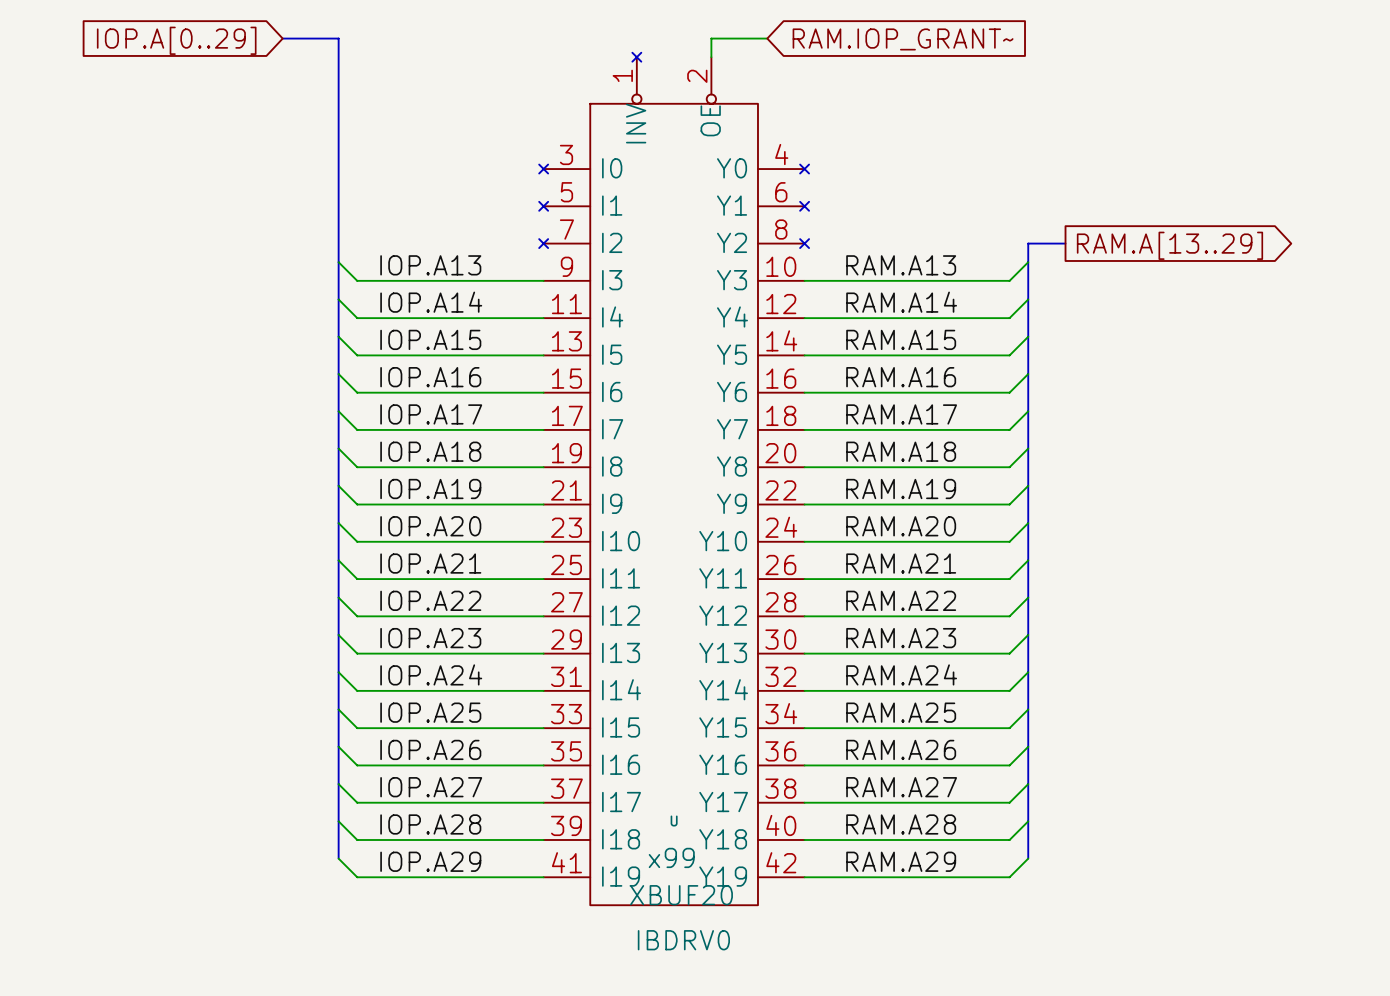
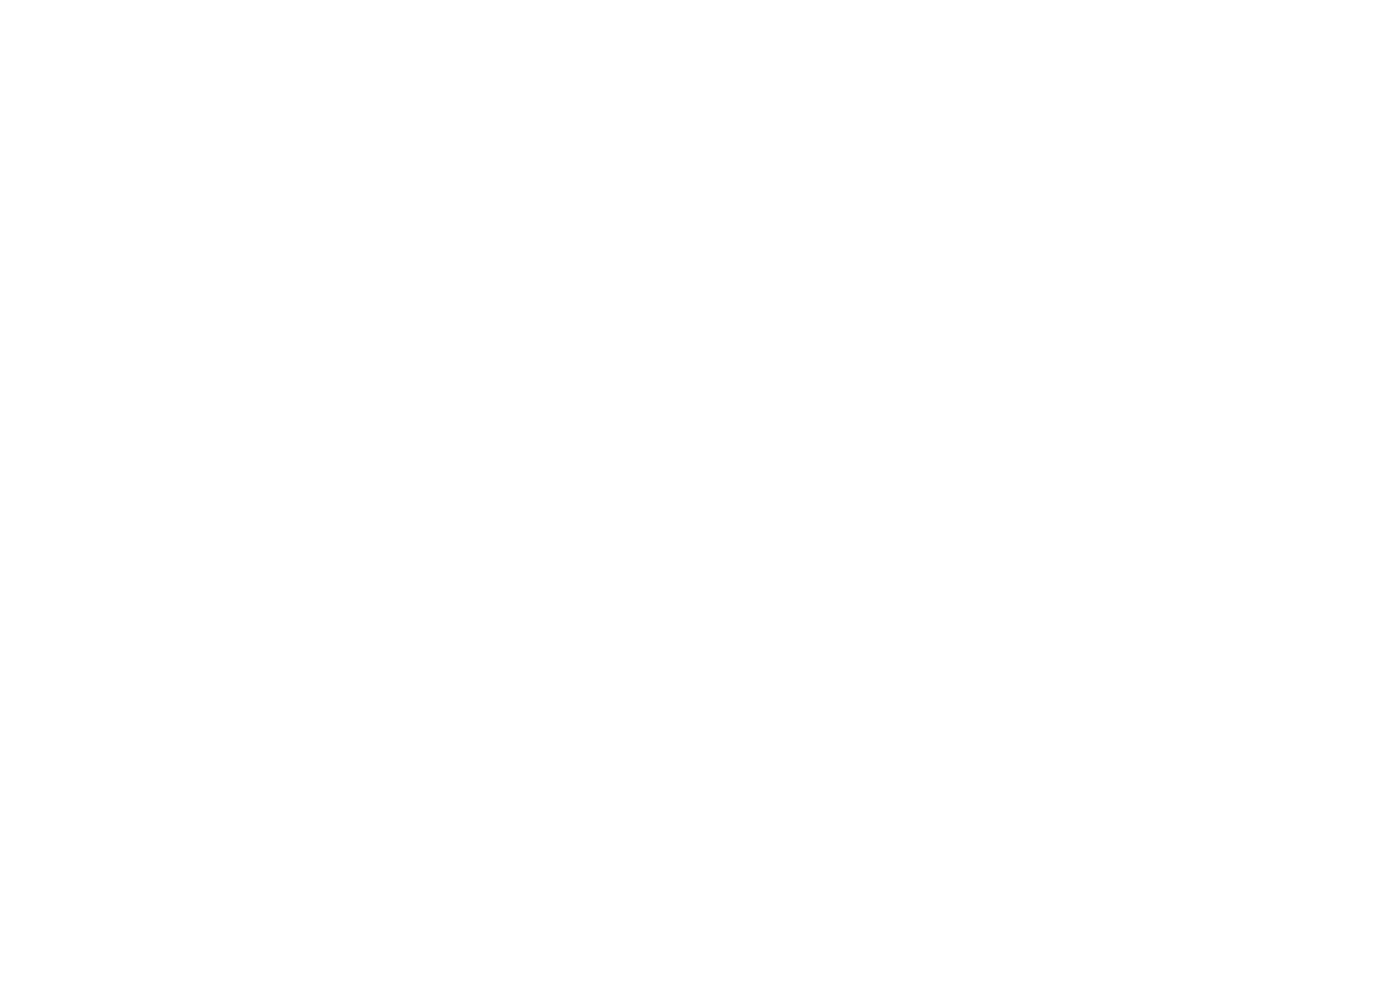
bus: (282, 38) (338, 38) (338, 858) -> none
wire: (767, 38) (711, 38) (711, 57) -> none
global label: RAM.IOP_GRANT~ (903, 39) -> none
global label: IOP.A[0..29] (176, 40) -> none
no-connect mark: (636, 57) -> none
no-connect mark: (543, 169) -> none
no-connect mark: (804, 169) -> none
no-connect mark: (543, 206) -> none
no-connect mark: (804, 206) -> none
no-connect mark: (543, 243) -> none
no-connect mark: (804, 243) -> none
bus: (1065, 243) (1028, 243) (1028, 858) -> none
global label: RAM.A[13..29] (1169, 245) -> none
wire: (338, 262) (357, 280) (543, 280) -> none
wire: (1028, 262) (1009, 280) (804, 280) -> none
label: IOP.A13 (430, 265) -> none
label: RAM.A13 (901, 265) -> none
wire: (338, 299) (357, 318) (543, 318) -> none
wire: (1028, 299) (1009, 318) (804, 318) -> none
label: IOP.A14 (431, 302) -> none
label: RAM.A14 (901, 302) -> none
wire: (338, 336) (357, 355) (543, 355) -> none
wire: (1028, 336) (1009, 355) (804, 355) -> none
label: IOP.A15 (430, 339) -> none
label: RAM.A15 (901, 339) -> none
wire: (338, 374) (357, 392) (543, 392) -> none
wire: (1028, 374) (1009, 392) (804, 392) -> none
label: IOP.A16 (430, 377) -> none
label: RAM.A16 (901, 377) -> none
wire: (338, 411) (357, 429) (543, 429) -> none
wire: (1028, 411) (1009, 429) (804, 429) -> none
label: IOP.A17 (431, 414) -> none
label: RAM.A17 (901, 414) -> none
wire: (338, 448) (357, 467) (543, 467) -> none
wire: (1028, 448) (1009, 467) (804, 467) -> none
label: IOP.A18 (430, 451) -> none
label: RAM.A18 (901, 451) -> none
U: XBUF20 (674, 481) -> none
wire: (338, 485) (357, 504) (543, 504) -> none
wire: (1028, 485) (1009, 504) (804, 504) -> none
label: IOP.A19 (430, 489) -> none
label: RAM.A19 (901, 489) -> none
wire: (338, 523) (357, 541) (543, 541) -> none
wire: (1028, 523) (1009, 541) (804, 541) -> none
label: IOP.A20 (430, 526) -> none
label: RAM.A20 (901, 526) -> none
wire: (338, 560) (357, 579) (543, 579) -> none
wire: (1028, 560) (1009, 579) (804, 579) -> none
label: IOP.A21 (430, 563) -> none
label: RAM.A21 (901, 563) -> none
wire: (338, 597) (357, 616) (543, 616) -> none
wire: (1028, 597) (1009, 616) (804, 616) -> none
label: IOP.A22 (430, 600) -> none
label: RAM.A22 (901, 600) -> none
wire: (338, 634) (357, 653) (543, 653) -> none
wire: (1028, 634) (1009, 653) (804, 653) -> none
label: IOP.A23 (430, 638) -> none
label: RAM.A23 (901, 638) -> none
wire: (338, 672) (357, 690) (543, 690) -> none
wire: (1028, 672) (1009, 690) (804, 690) -> none
label: IOP.A24 (431, 674) -> none
label: RAM.A24 (901, 674) -> none
wire: (338, 709) (357, 728) (543, 728) -> none
wire: (1028, 709) (1009, 728) (804, 728) -> none
label: IOP.A25 (430, 712) -> none
label: RAM.A25 (901, 712) -> none
wire: (338, 746) (357, 765) (543, 765) -> none
wire: (1028, 746) (1009, 765) (804, 765) -> none
label: IOP.A26 (430, 749) -> none
label: RAM.A26 (901, 749) -> none
wire: (338, 784) (357, 802) (543, 802) -> none
wire: (1028, 784) (1009, 802) (804, 802) -> none
label: IOP.A27 (431, 787) -> none
label: RAM.A27 (901, 787) -> none
wire: (338, 821) (357, 839) (543, 839) -> none
wire: (1028, 821) (1009, 839) (804, 839) -> none
label: IOP.A28 (430, 824) -> none
label: RAM.A28 (901, 824) -> none
wire: (338, 858) (357, 877) (543, 877) -> none
wire: (1028, 858) (1009, 877) (804, 877) -> none
label: IOP.A29 (430, 861) -> none
label: RAM.A29 (901, 861) -> none

